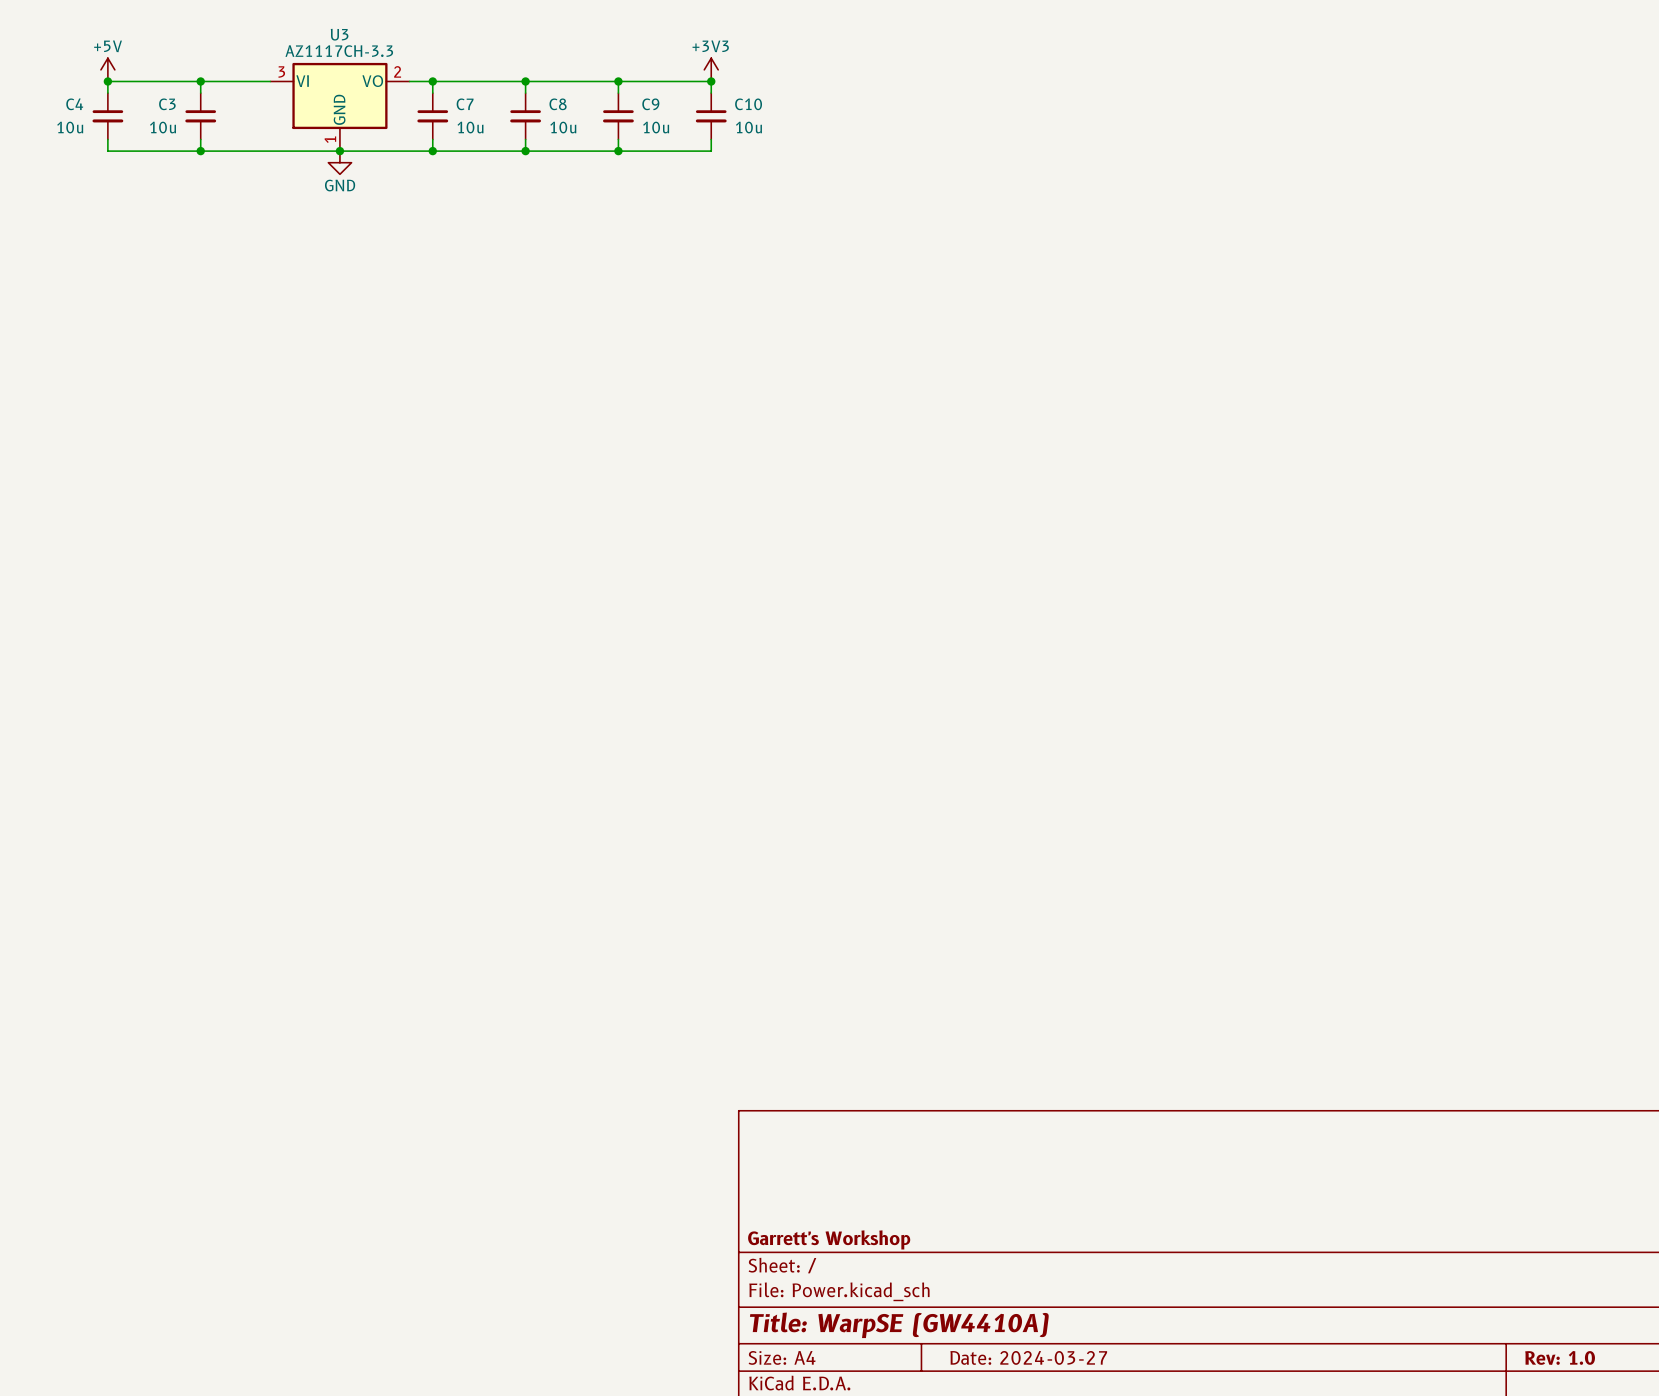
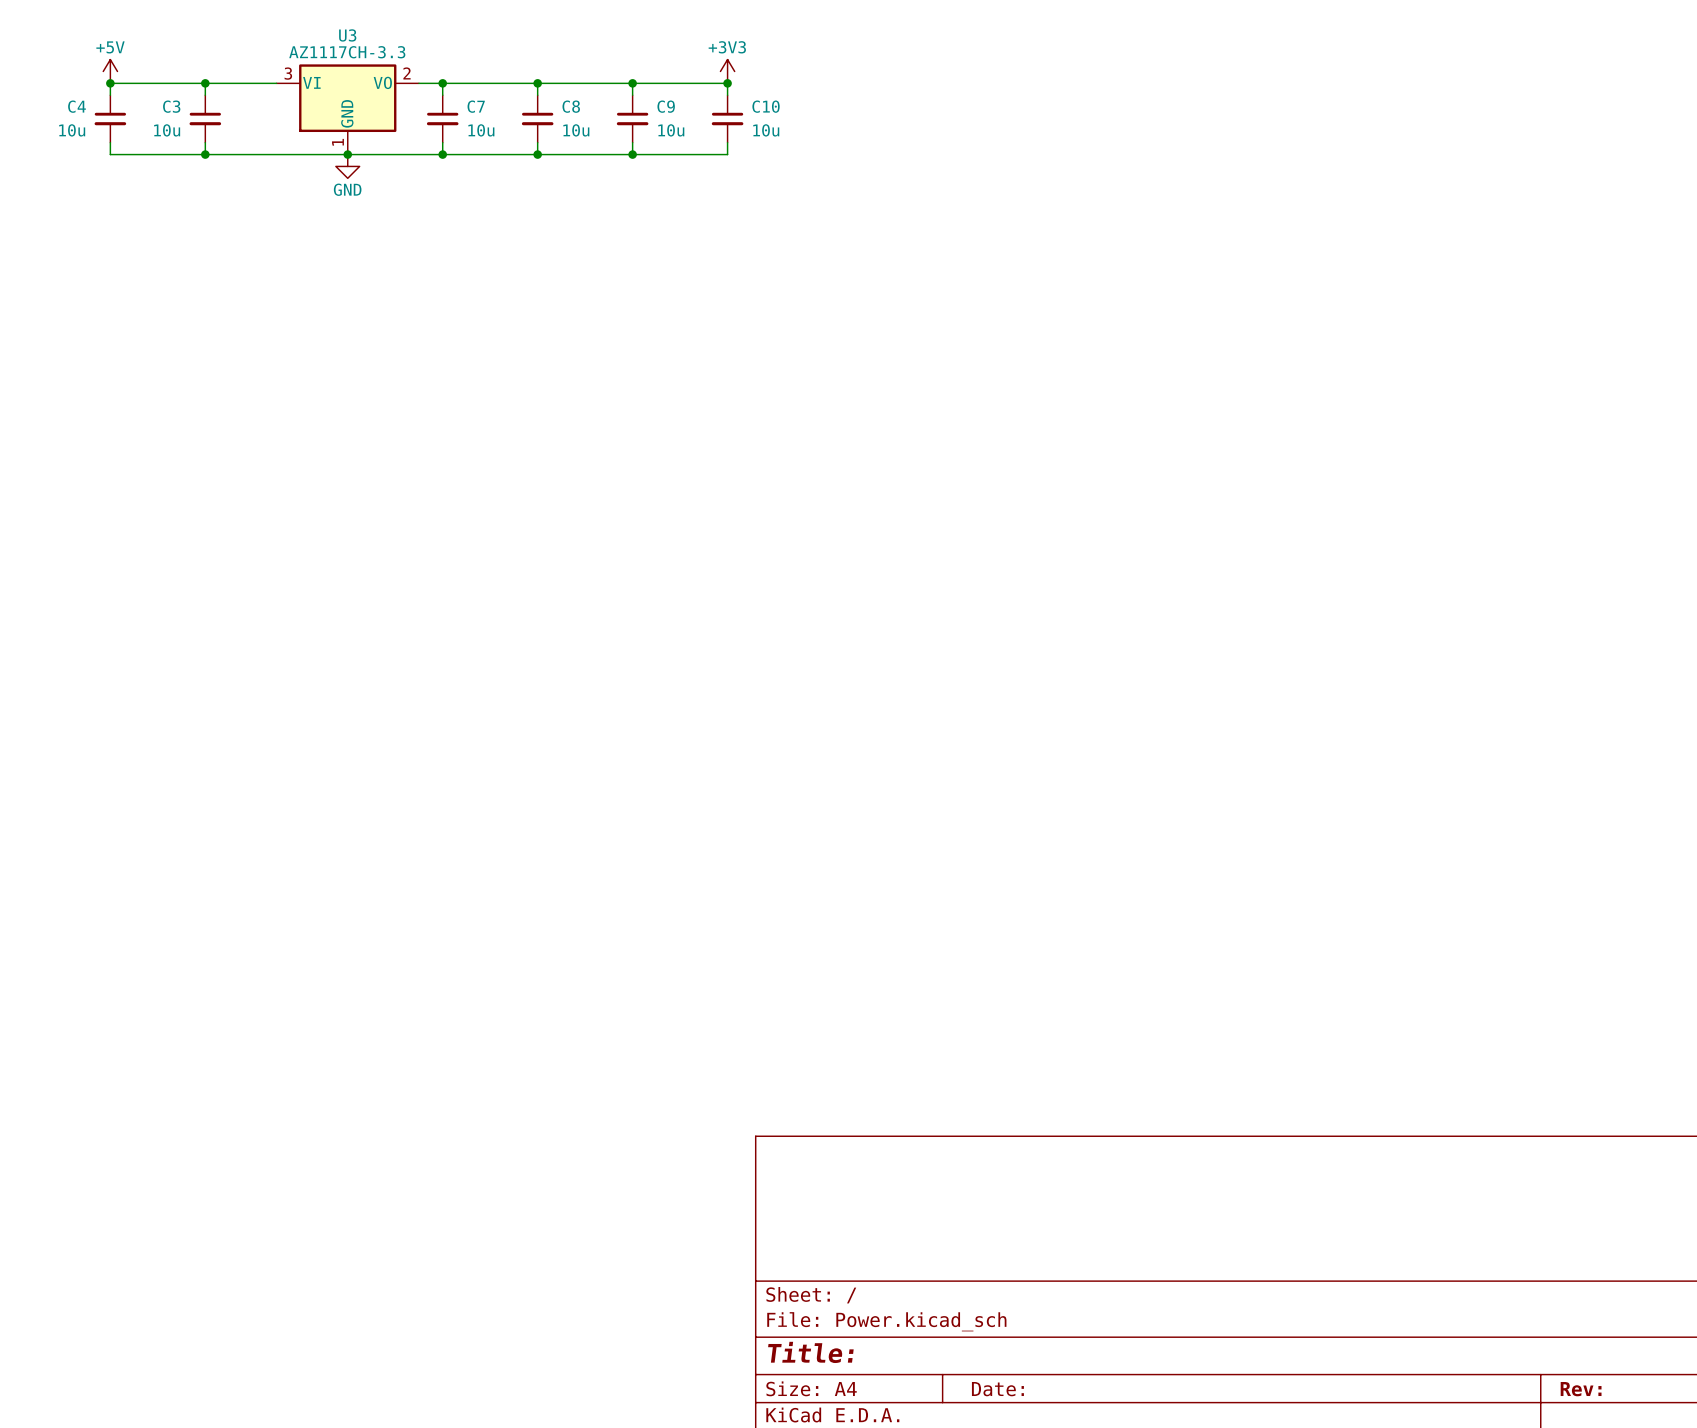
title block: Garrett's Workshop (829, 1239) -> none
title block: Title: WarpSE (GW4410A) (899, 1325) -> Title: (810, 1352)
title block: Date: 2024-03-27 (1028, 1357) -> Date: (997, 1389)
title block: Rev: 1.0 (1560, 1357) -> Rev: (1581, 1389)

